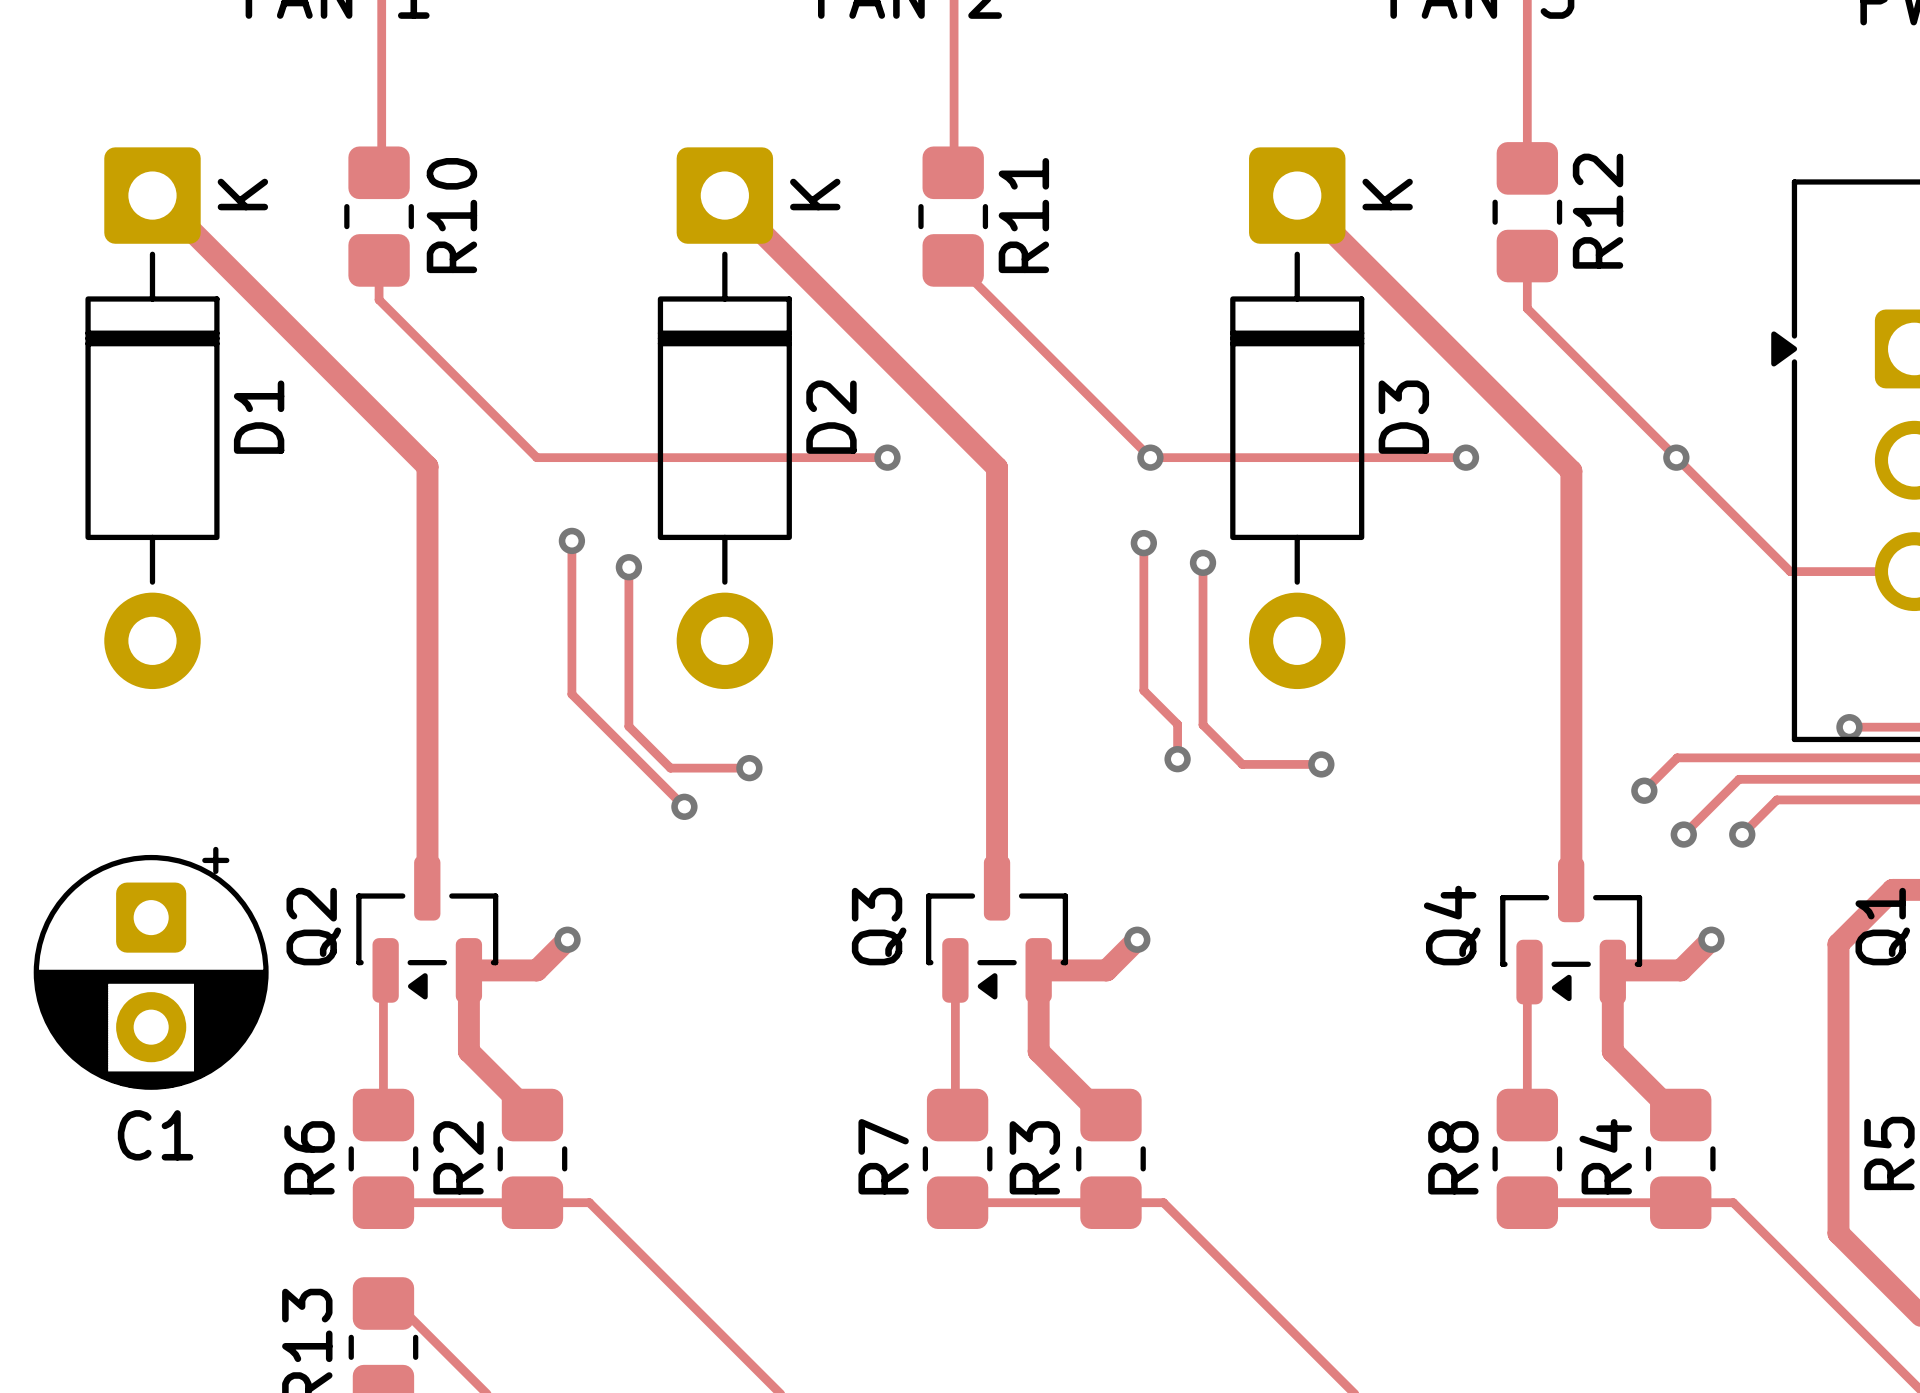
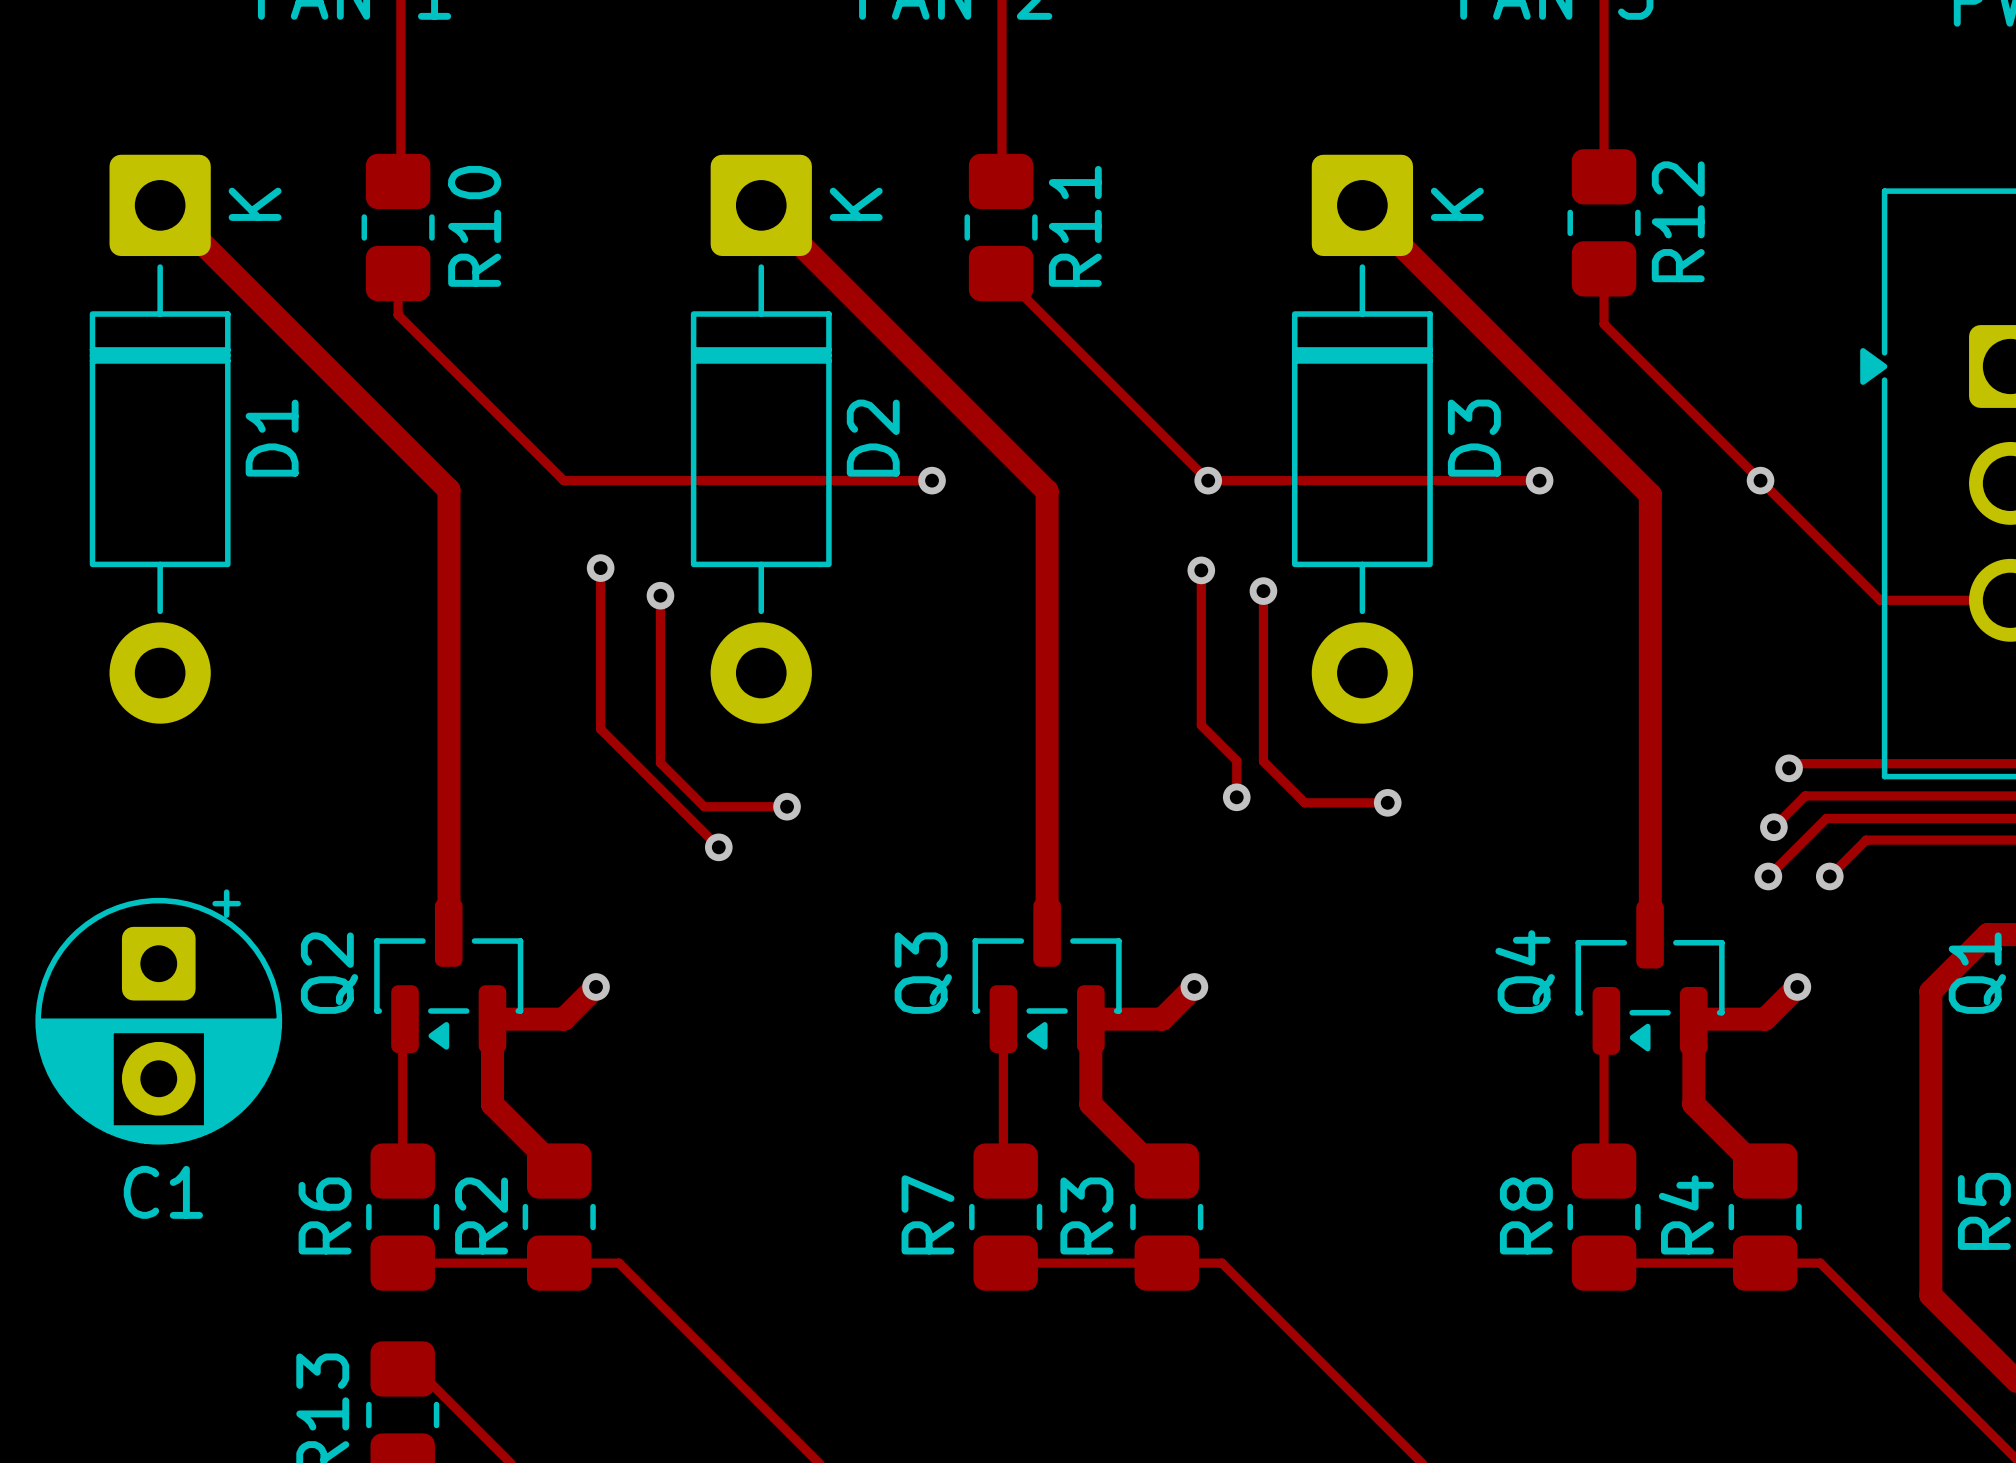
track: none -> (1942, 763) (1793, 763) (1789, 768)
via: (1849, 727) -> none
via: none -> (1789, 768)
track: (1718, 757) (1677, 757) (1644, 790) -> (1805, 795) (1773, 827)
via: none -> (1773, 827)
via: (1644, 790) -> none

